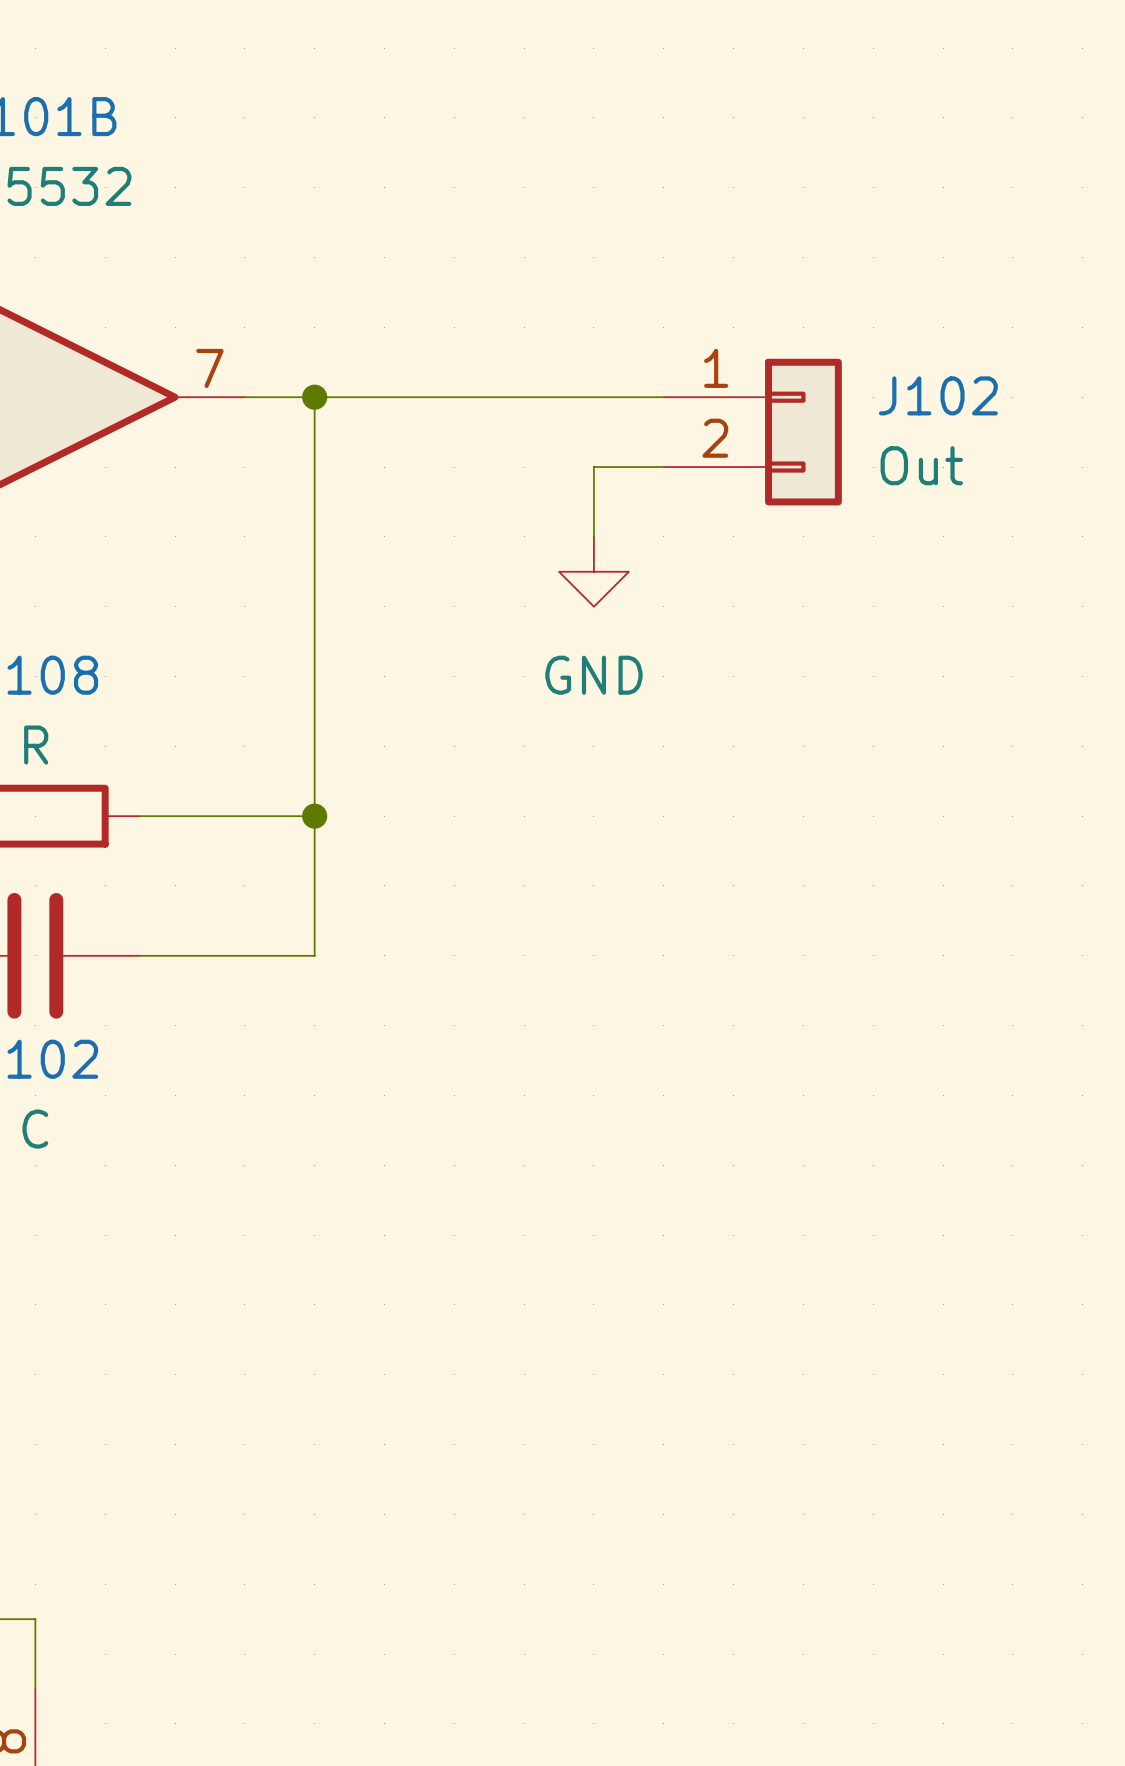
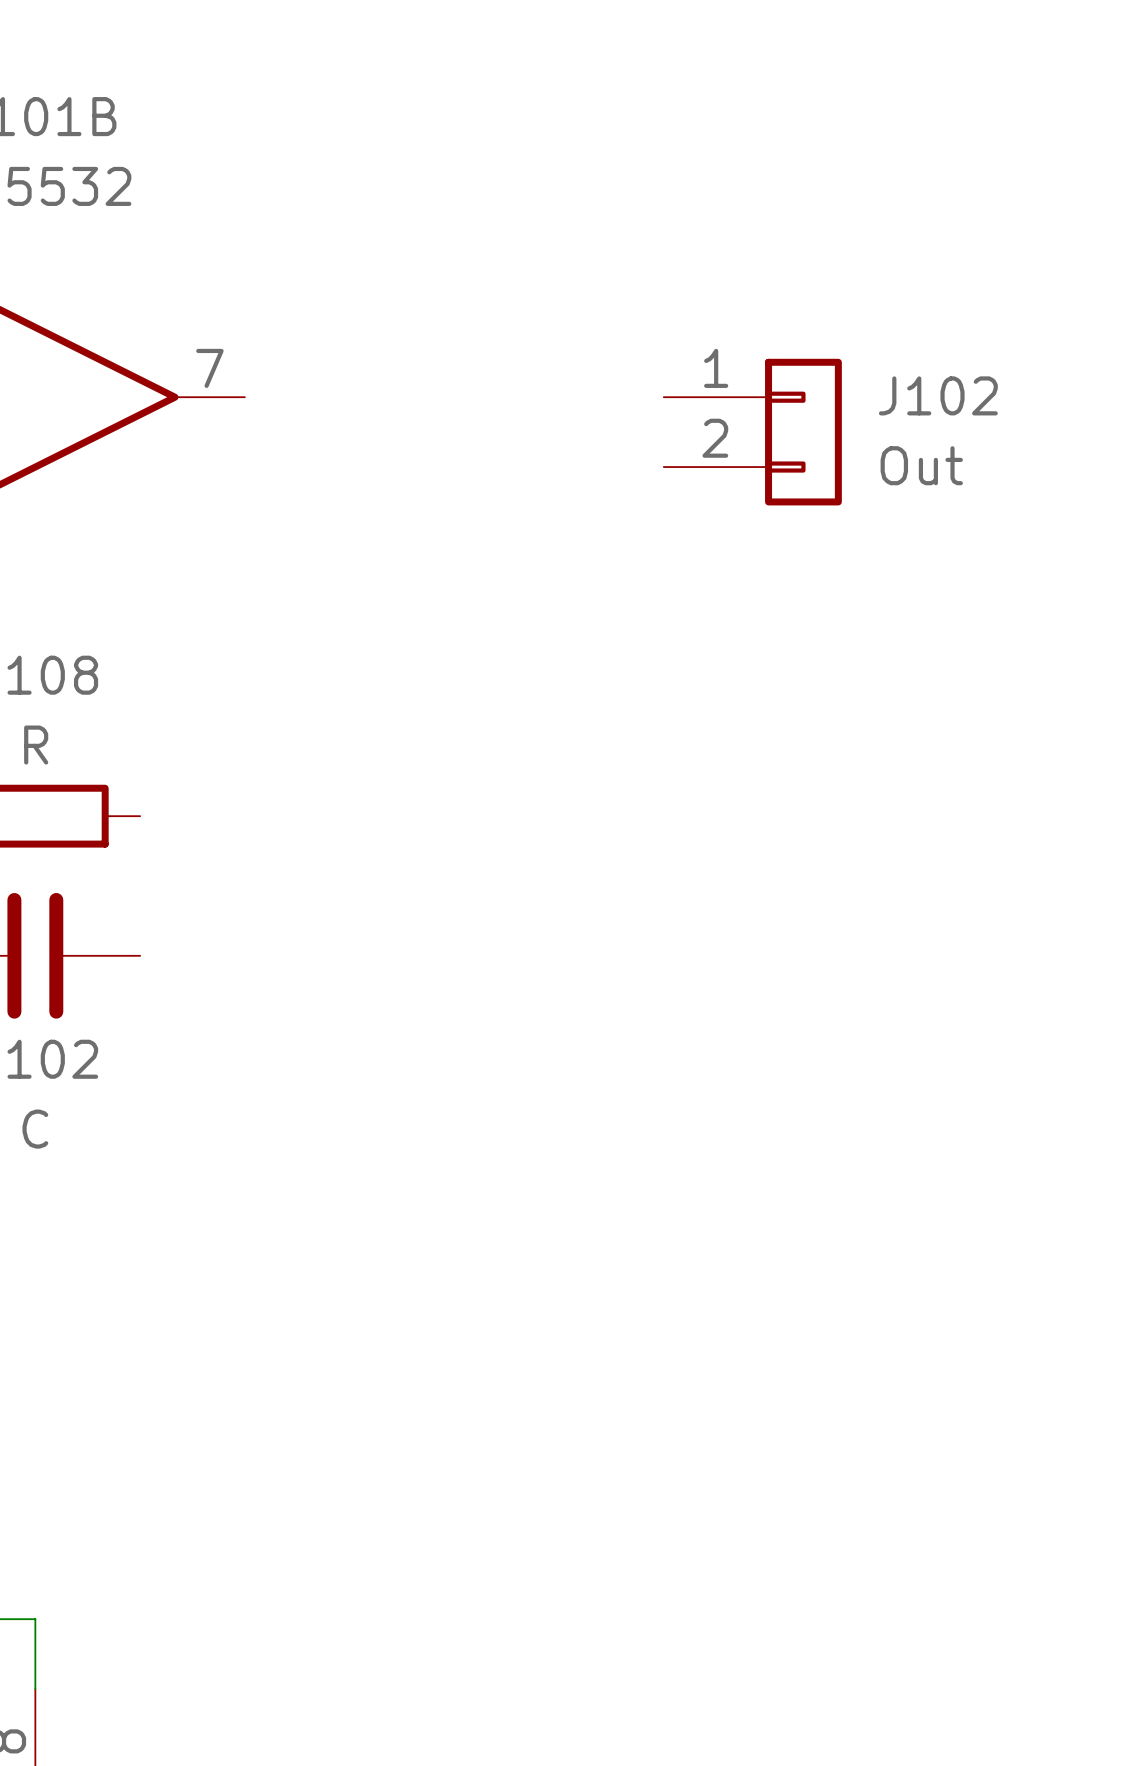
wire: (244, 397) (663, 397) -> none
wire: (314, 397) (314, 955) (140, 955) -> none
junction: (314, 397) -> none
wire: (663, 467) (593, 467) (593, 536) -> none
power symbol: GND (593, 571) -> none
wire: (140, 816) (314, 816) -> none
junction: (314, 816) -> none

